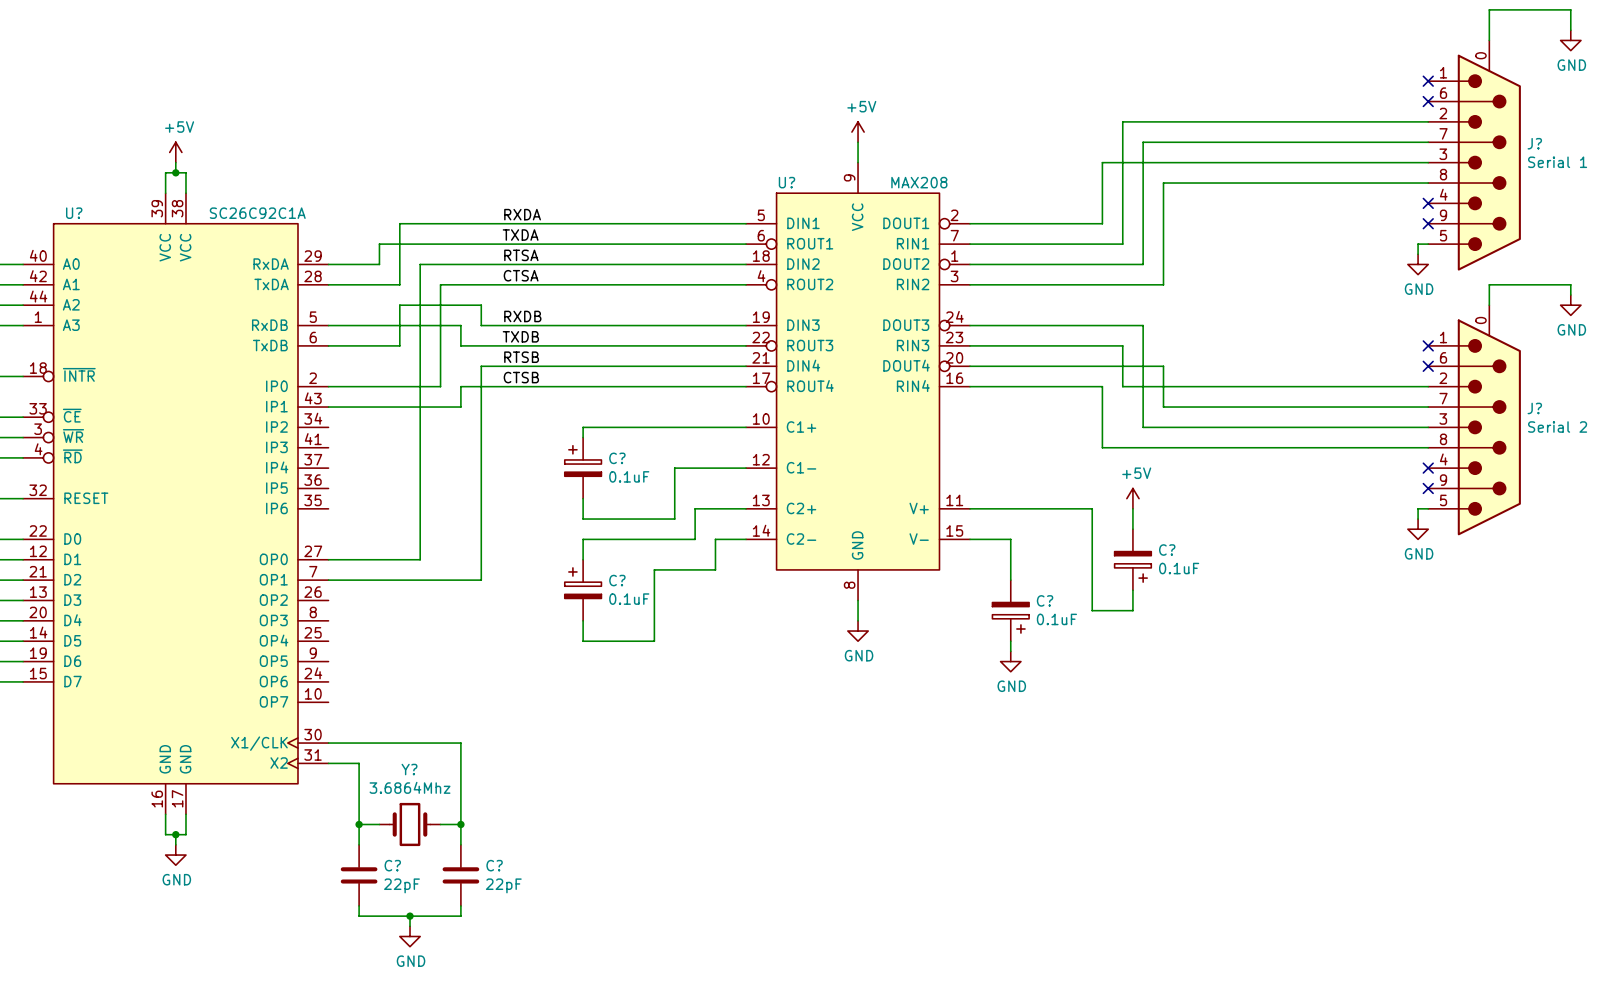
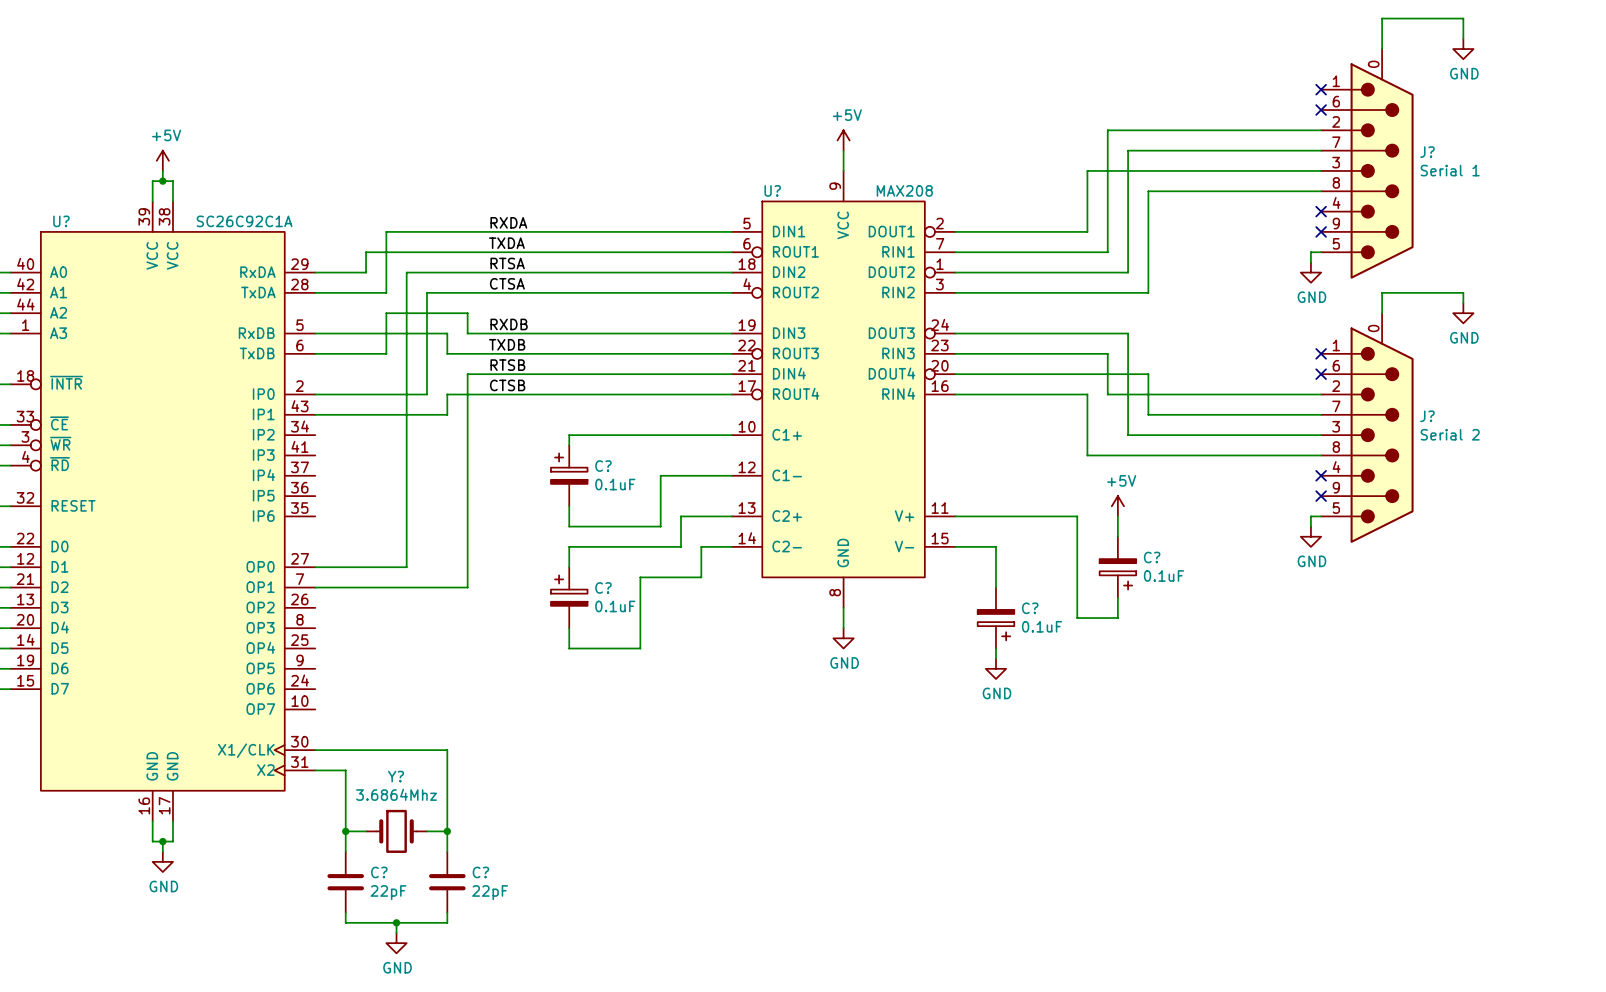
wire: (1570, 30) (1570, 9) (1489, 9) (1489, 40) -> (1463, 38) (1463, 18) (1382, 18) (1382, 49)
power symbol position: GND (1570, 40) -> GND (1463, 49)
no-connect mark: none -> (1321, 89)
no-connect mark: (1428, 81) -> none
no-connect mark: none -> (1321, 110)
no-connect mark: (1428, 101) -> none
J? position: (1474, 155) -> (1367, 163)
no-connect mark: none -> (1321, 211)
no-connect mark: (1428, 203) -> none
no-connect mark: none -> (1321, 231)
no-connect mark: (1428, 223) -> none
wire: (1428, 244) (1418, 244) (1418, 254) -> (1321, 252) (1310, 252) (1310, 262)
power symbol: none -> GND (1310, 272)
power symbol: GND (1418, 264) -> none
wire: (1570, 295) (1570, 284) (1489, 284) (1489, 305) -> (1463, 303) (1463, 292) (1382, 292) (1382, 313)
power symbol: none -> GND (1463, 313)
power symbol: GND (1570, 305) -> none
no-connect mark: none -> (1321, 353)
no-connect mark: (1428, 345) -> none
no-connect mark: none -> (1321, 374)
no-connect mark: (1428, 366) -> none
J? position: (1474, 420) -> (1367, 428)
no-connect mark: none -> (1321, 475)
no-connect mark: (1428, 468) -> none
no-connect mark: none -> (1321, 496)
no-connect mark: (1428, 488) -> none
wire: (1428, 508) (1418, 508) (1418, 519) -> (1321, 516) (1310, 516) (1310, 526)
power symbol position: GND (1418, 529) -> GND (1310, 536)

